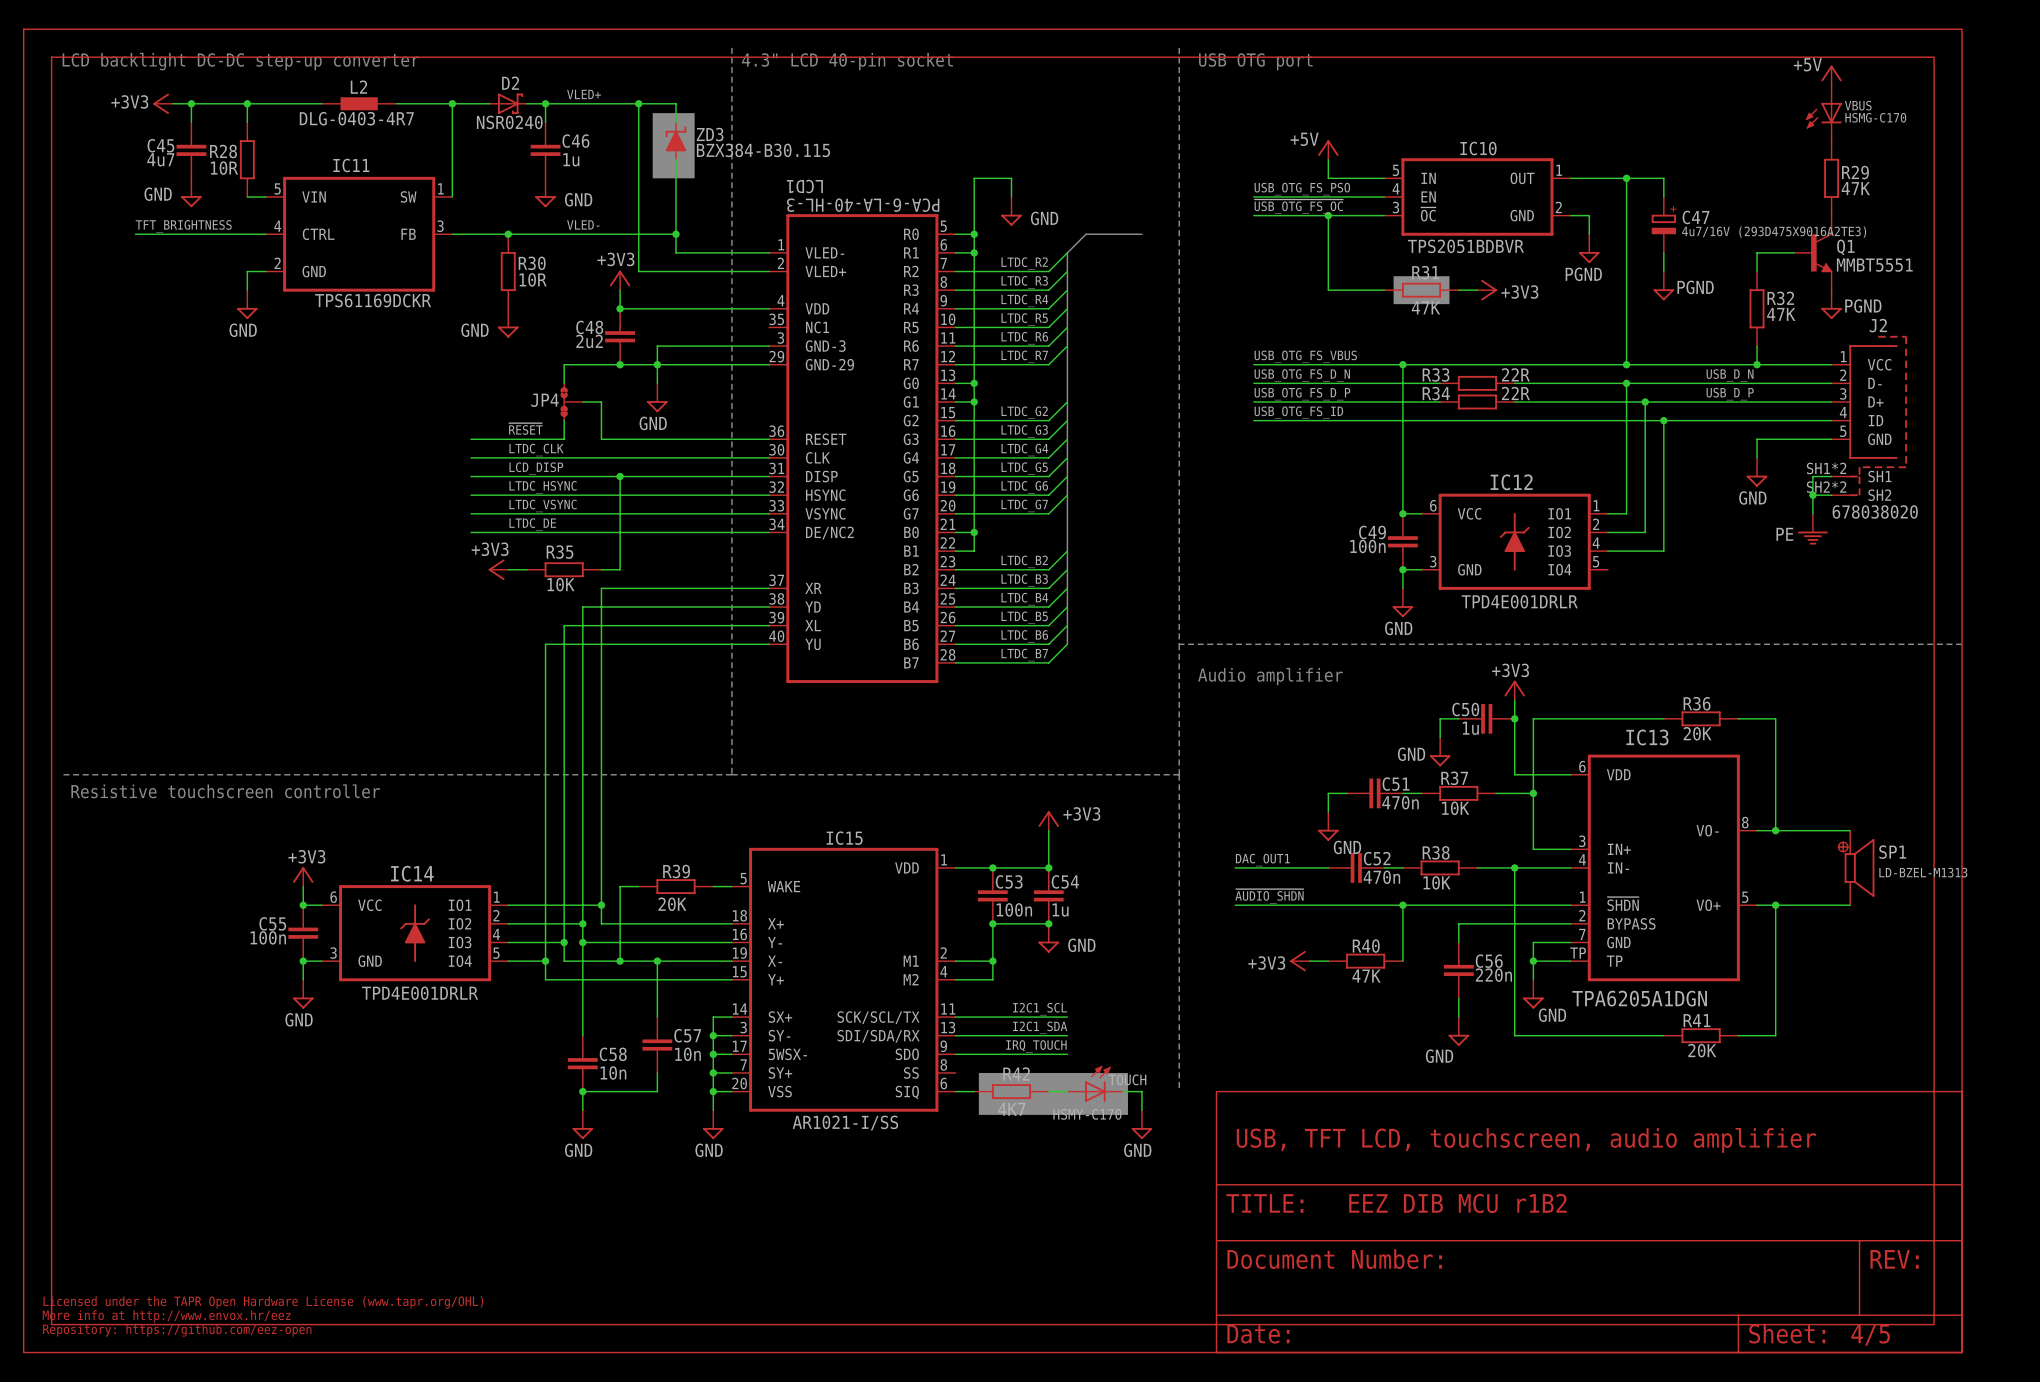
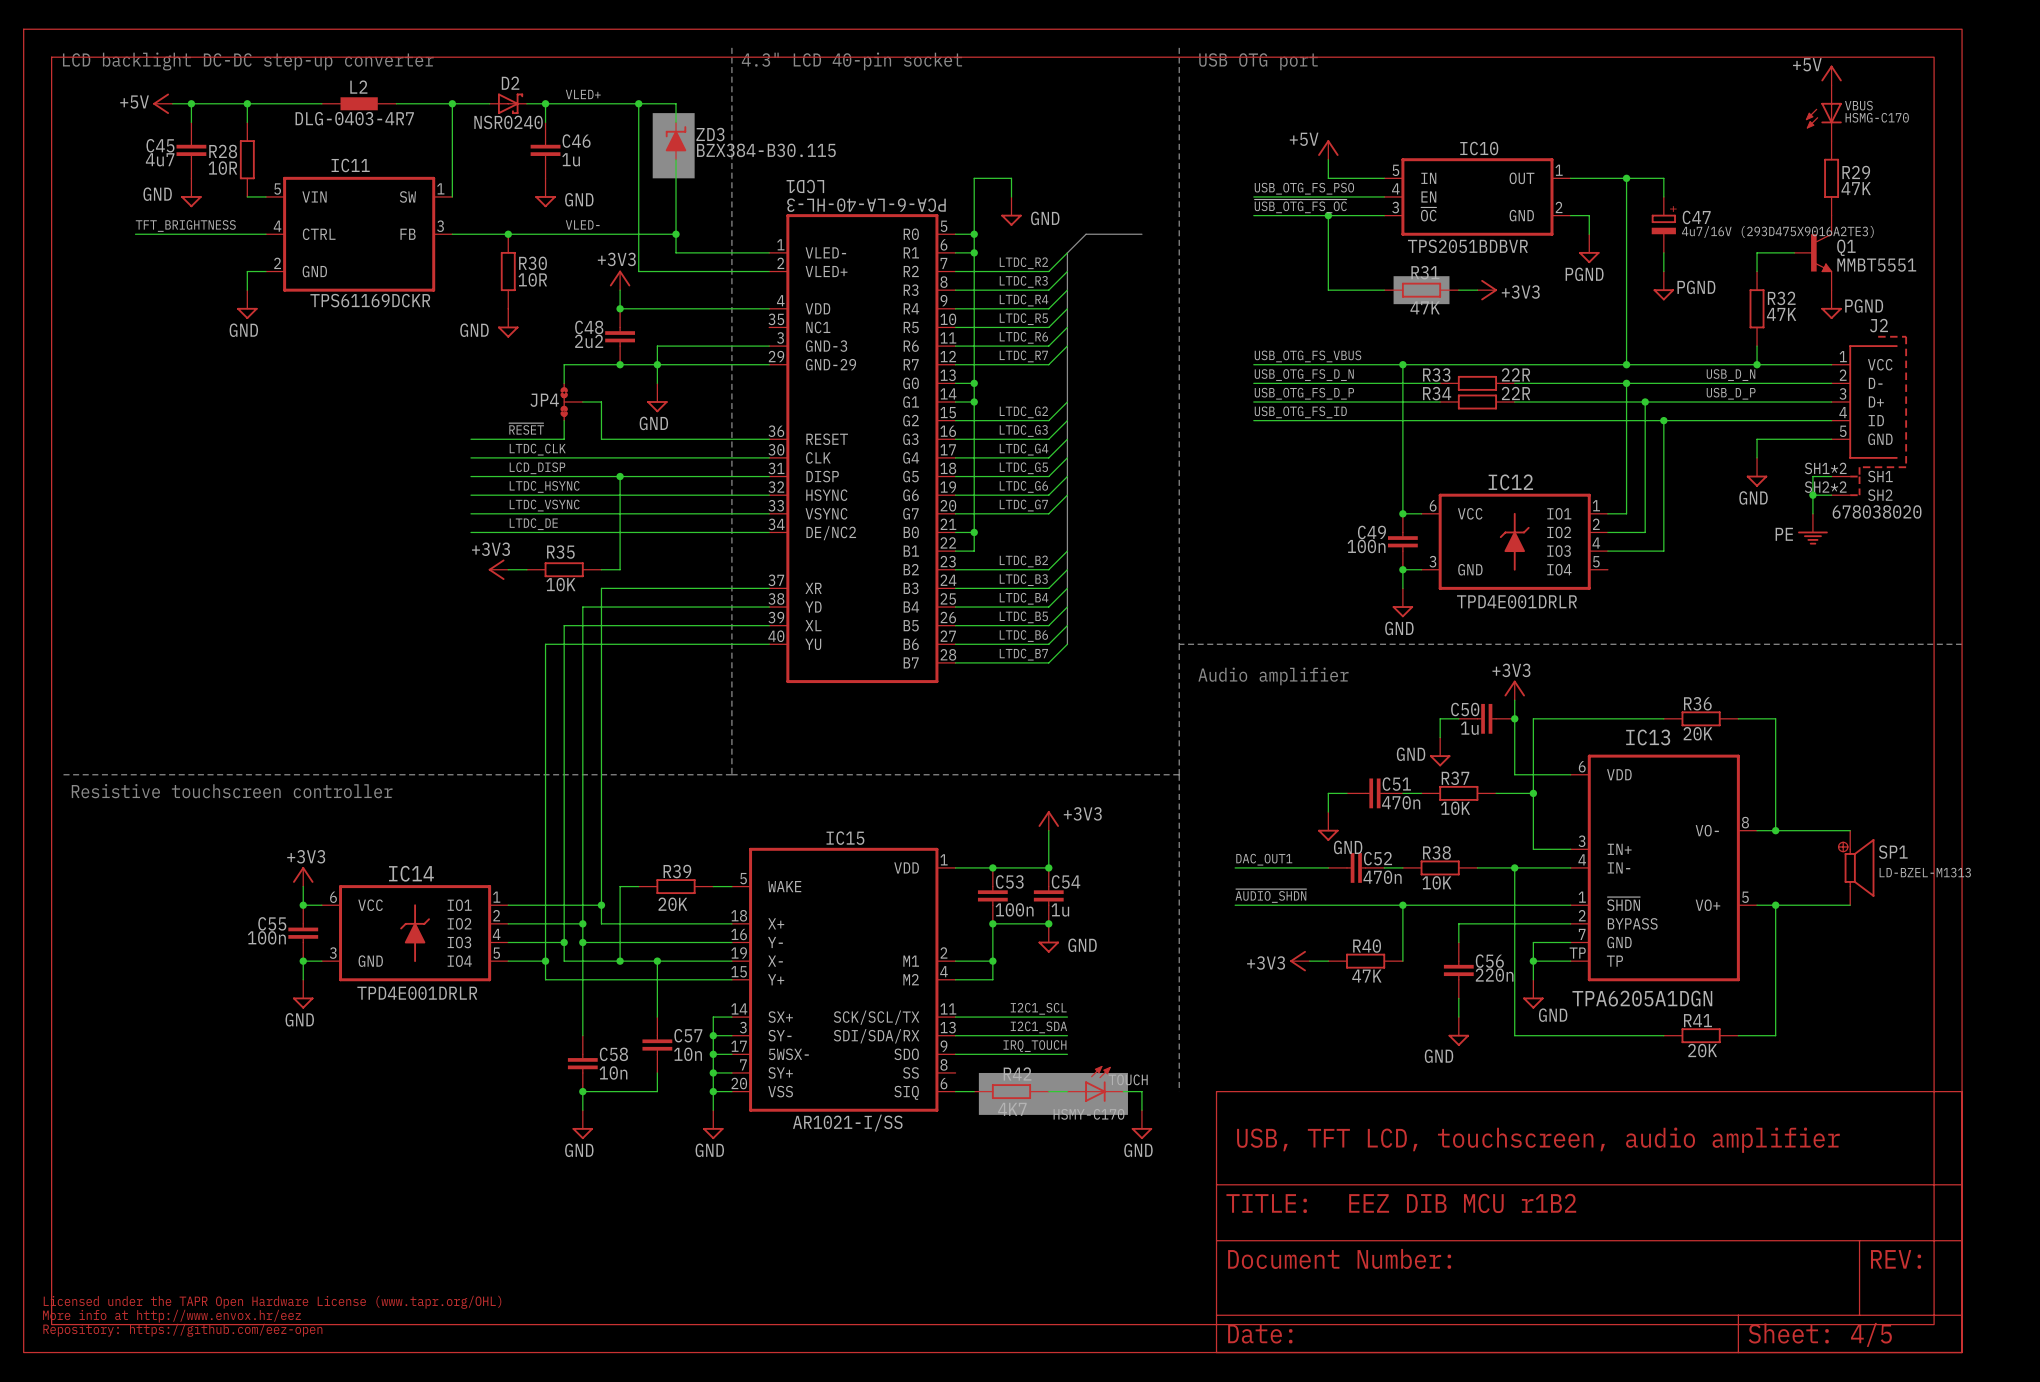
power symbol: +3V3 (162, 103) -> +5V (162, 103)

